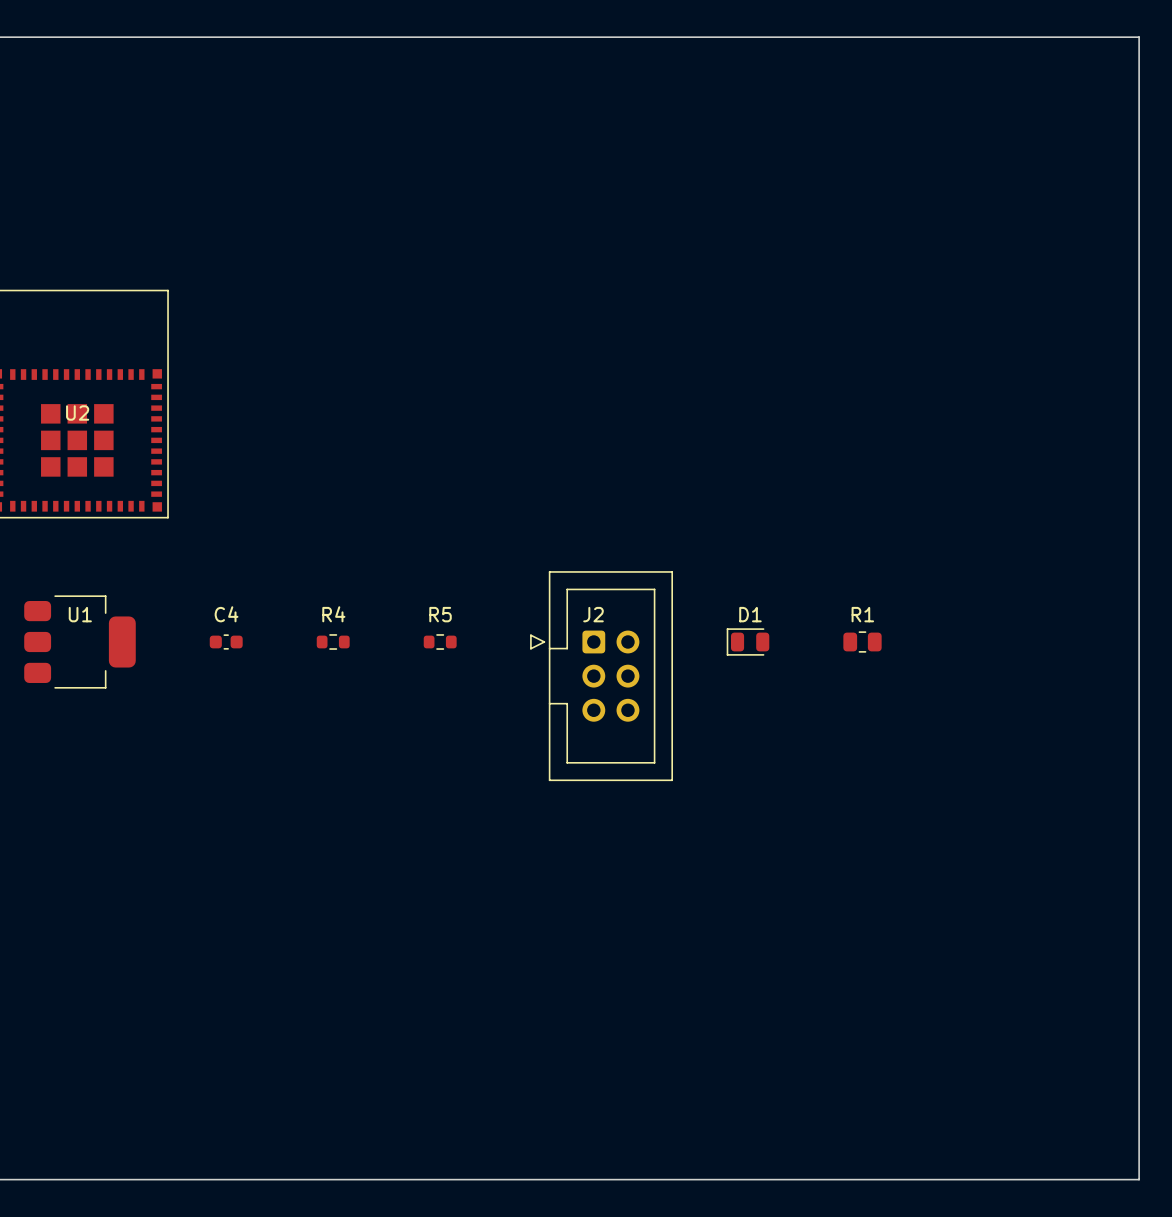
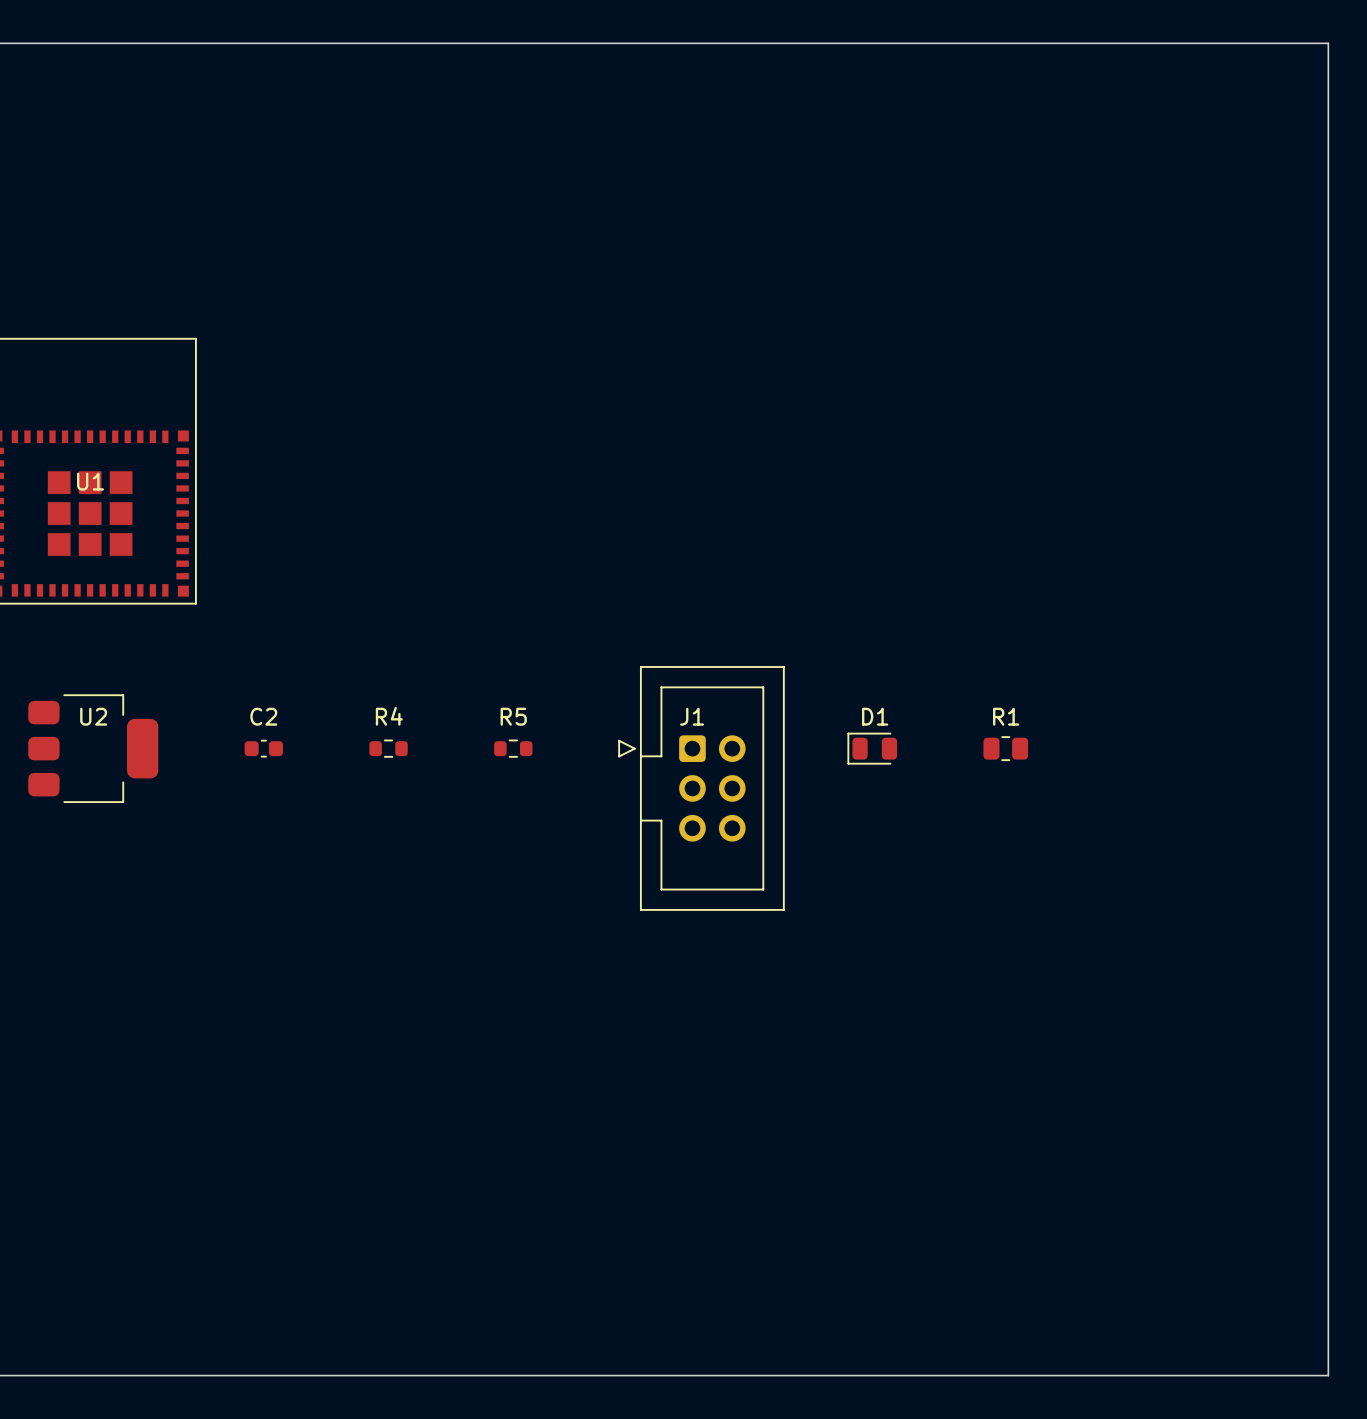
U2 name: U2 (77, 413) -> U1 (90, 481)
U1 name: U1 (80, 614) -> U2 (93, 716)
C4 name: C4 (226, 614) -> C2 (263, 716)
J2 name: J2 (593, 614) -> J1 (692, 716)

